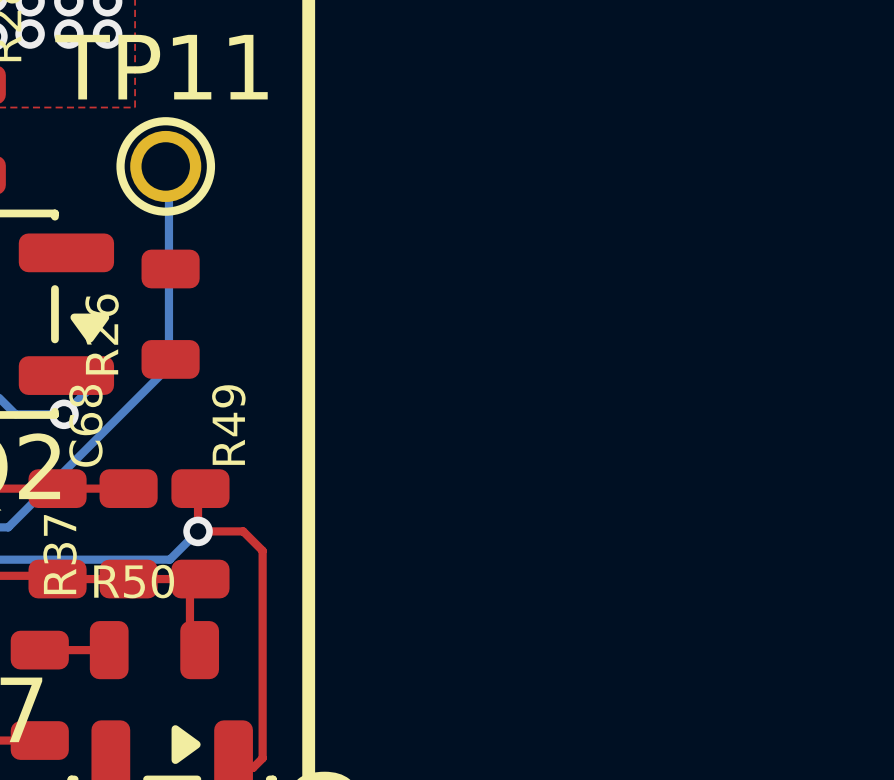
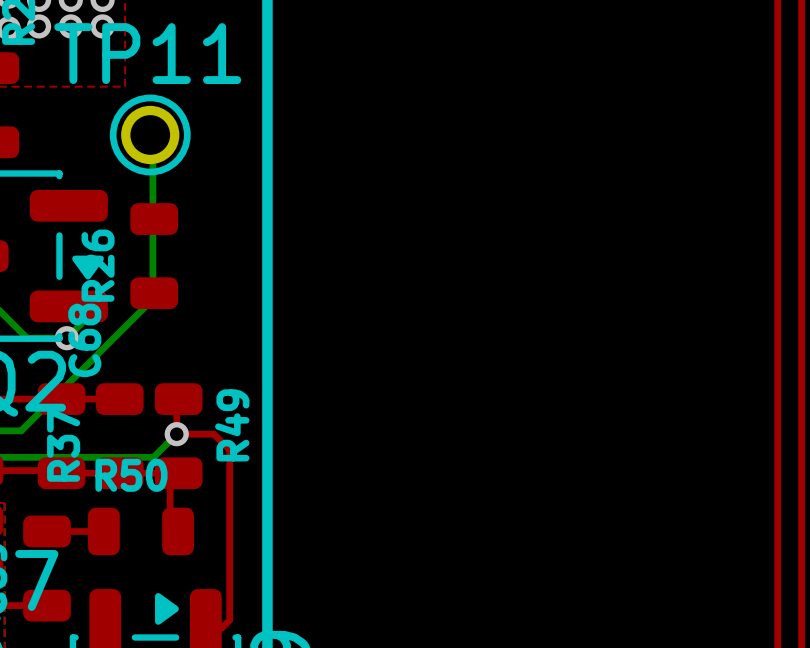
R49 name position: R49 (228, 425) -> R49 (232, 425)

